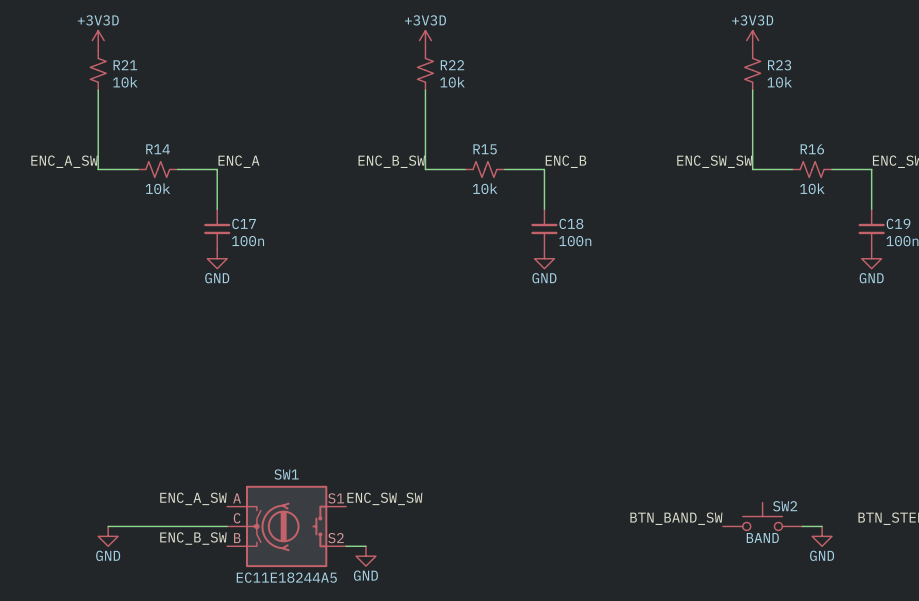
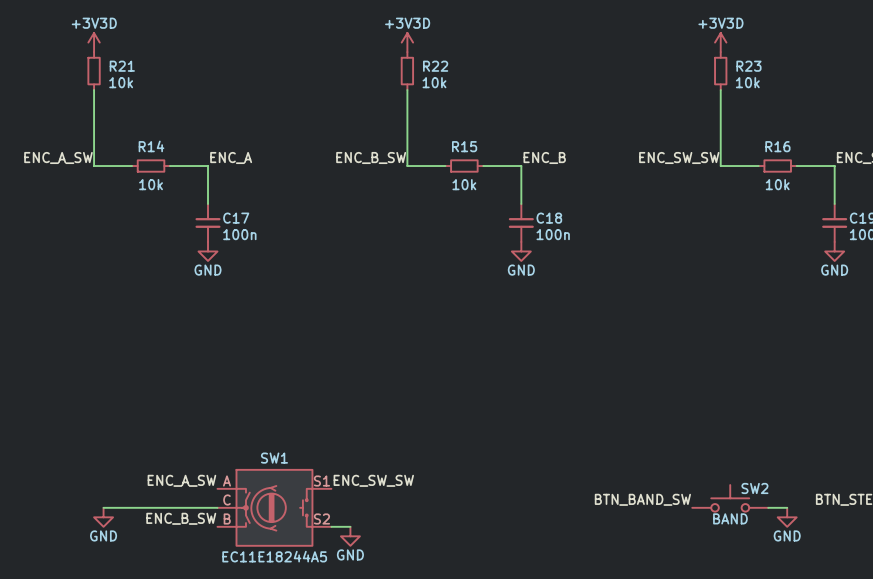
R21 symbol: [90, 50, 107, 91] -> [87, 52, 101, 91]
R22 symbol: [417, 50, 434, 91] -> [400, 52, 414, 91]
R23 symbol: [744, 50, 761, 91] -> [714, 52, 728, 91]
R14 symbol: [137, 161, 178, 178] -> [132, 159, 171, 173]
R15 symbol: [465, 161, 505, 178] -> [445, 159, 484, 173]
R16 symbol: [792, 161, 832, 178] -> [758, 159, 797, 173]

